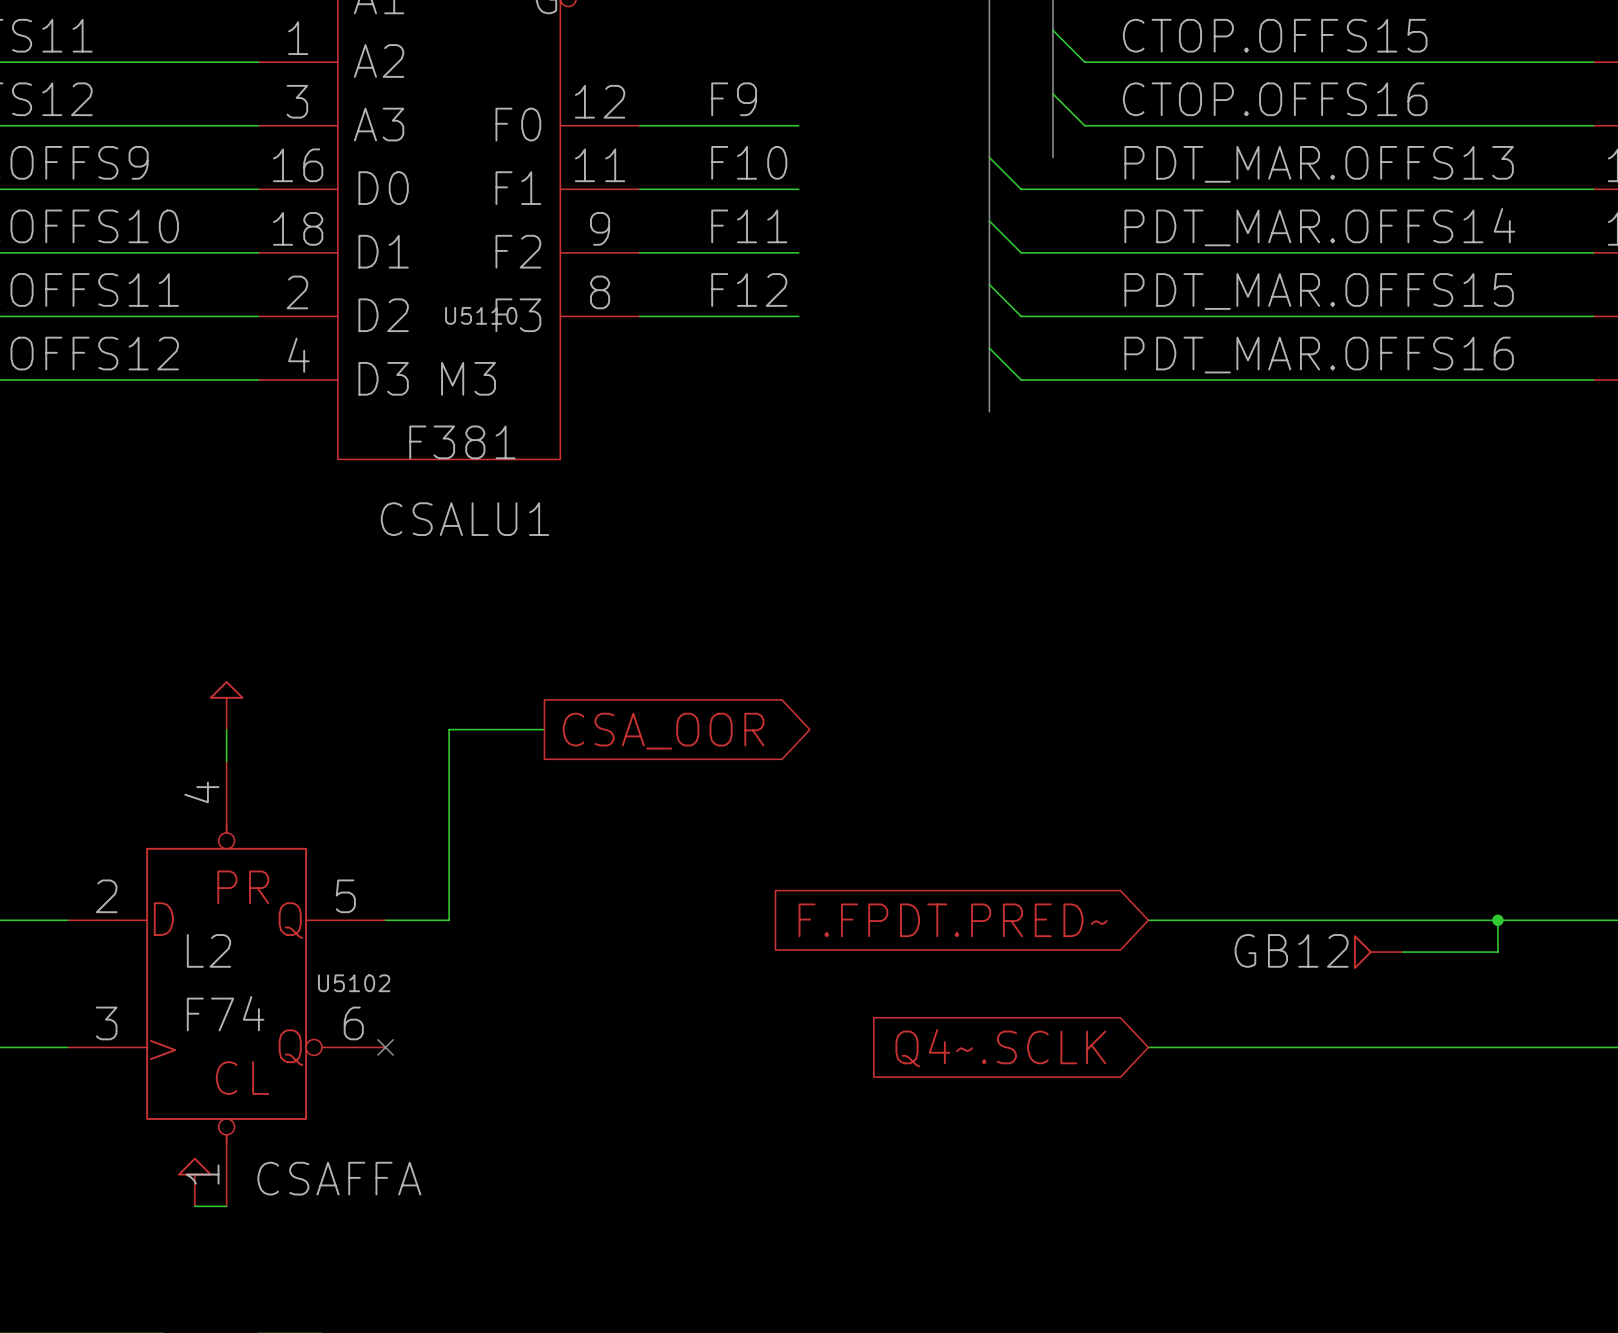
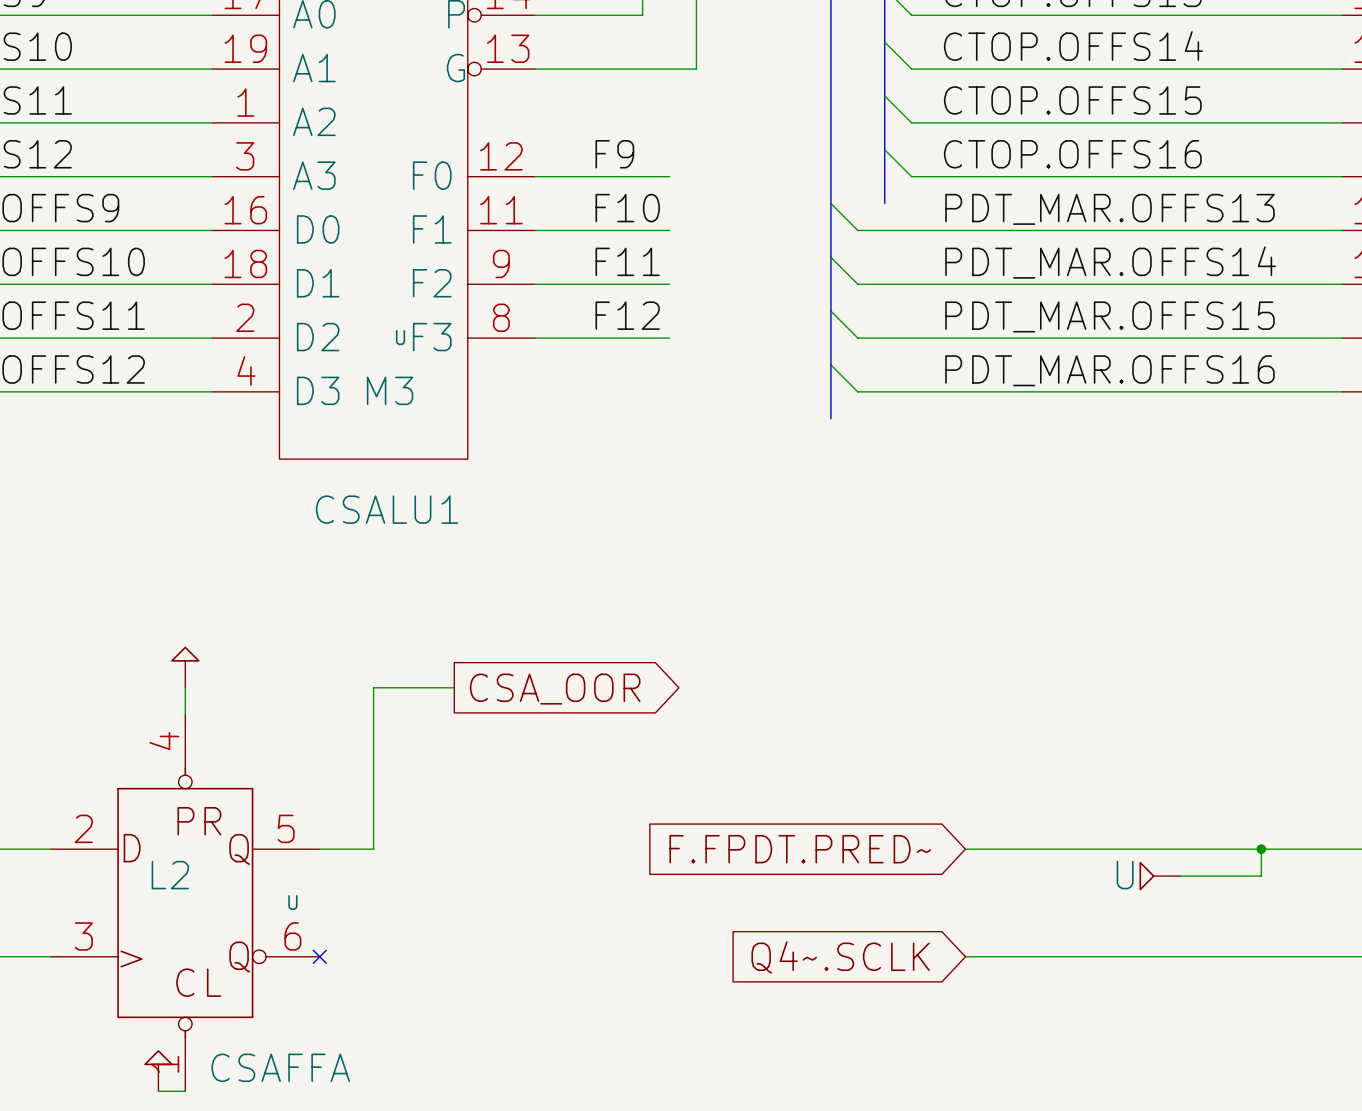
U5110 name: U5110 (481, 315) -> U (400, 337)
U5110 value: F381 (462, 442) -> none
GB12 name: GB12 (1291, 950) -> U (1125, 875)
U5102 name: U5102 (354, 983) -> U (292, 902)
U5102 value: F74 (225, 1013) -> none

